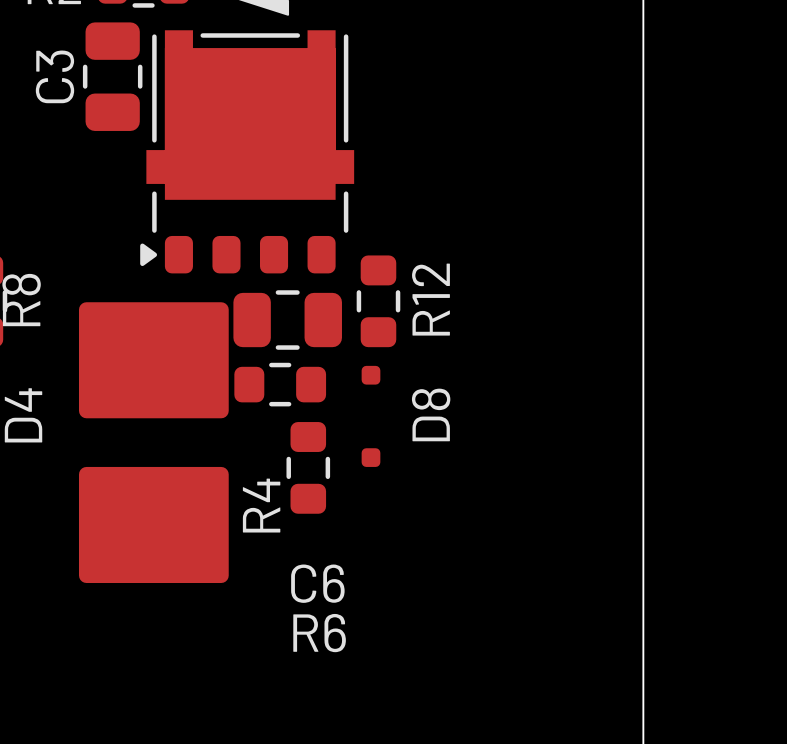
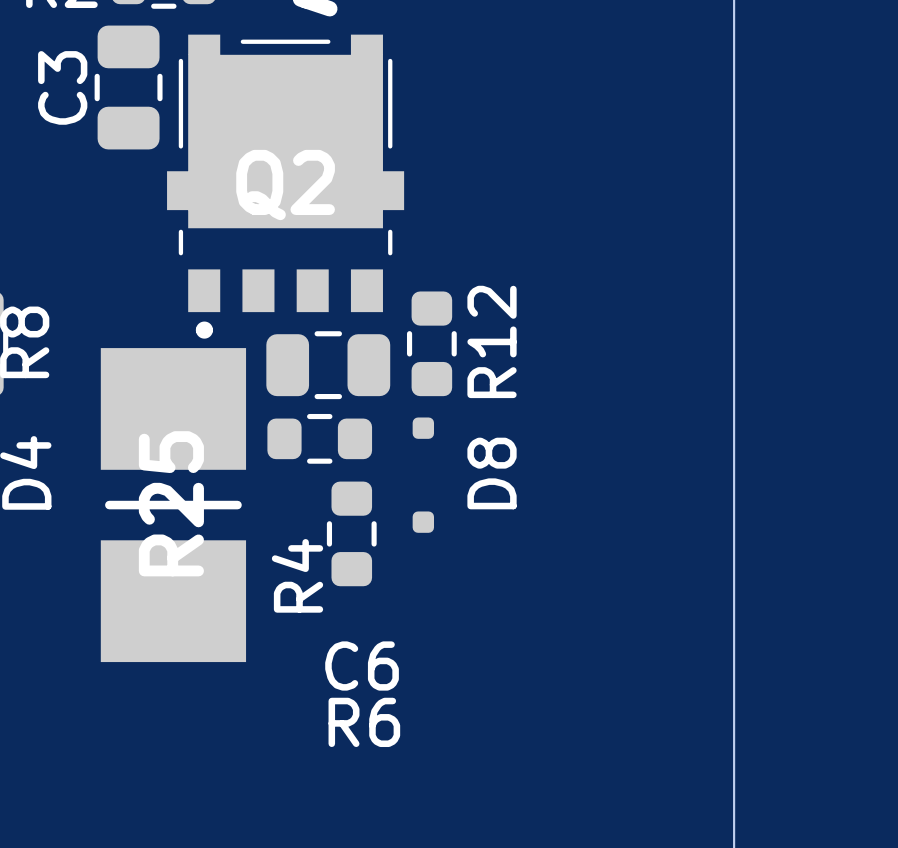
part: (247, 151) -> none
part: none -> (285, 186)
part: none -> (173, 505)
part: (153, 442) -> none

